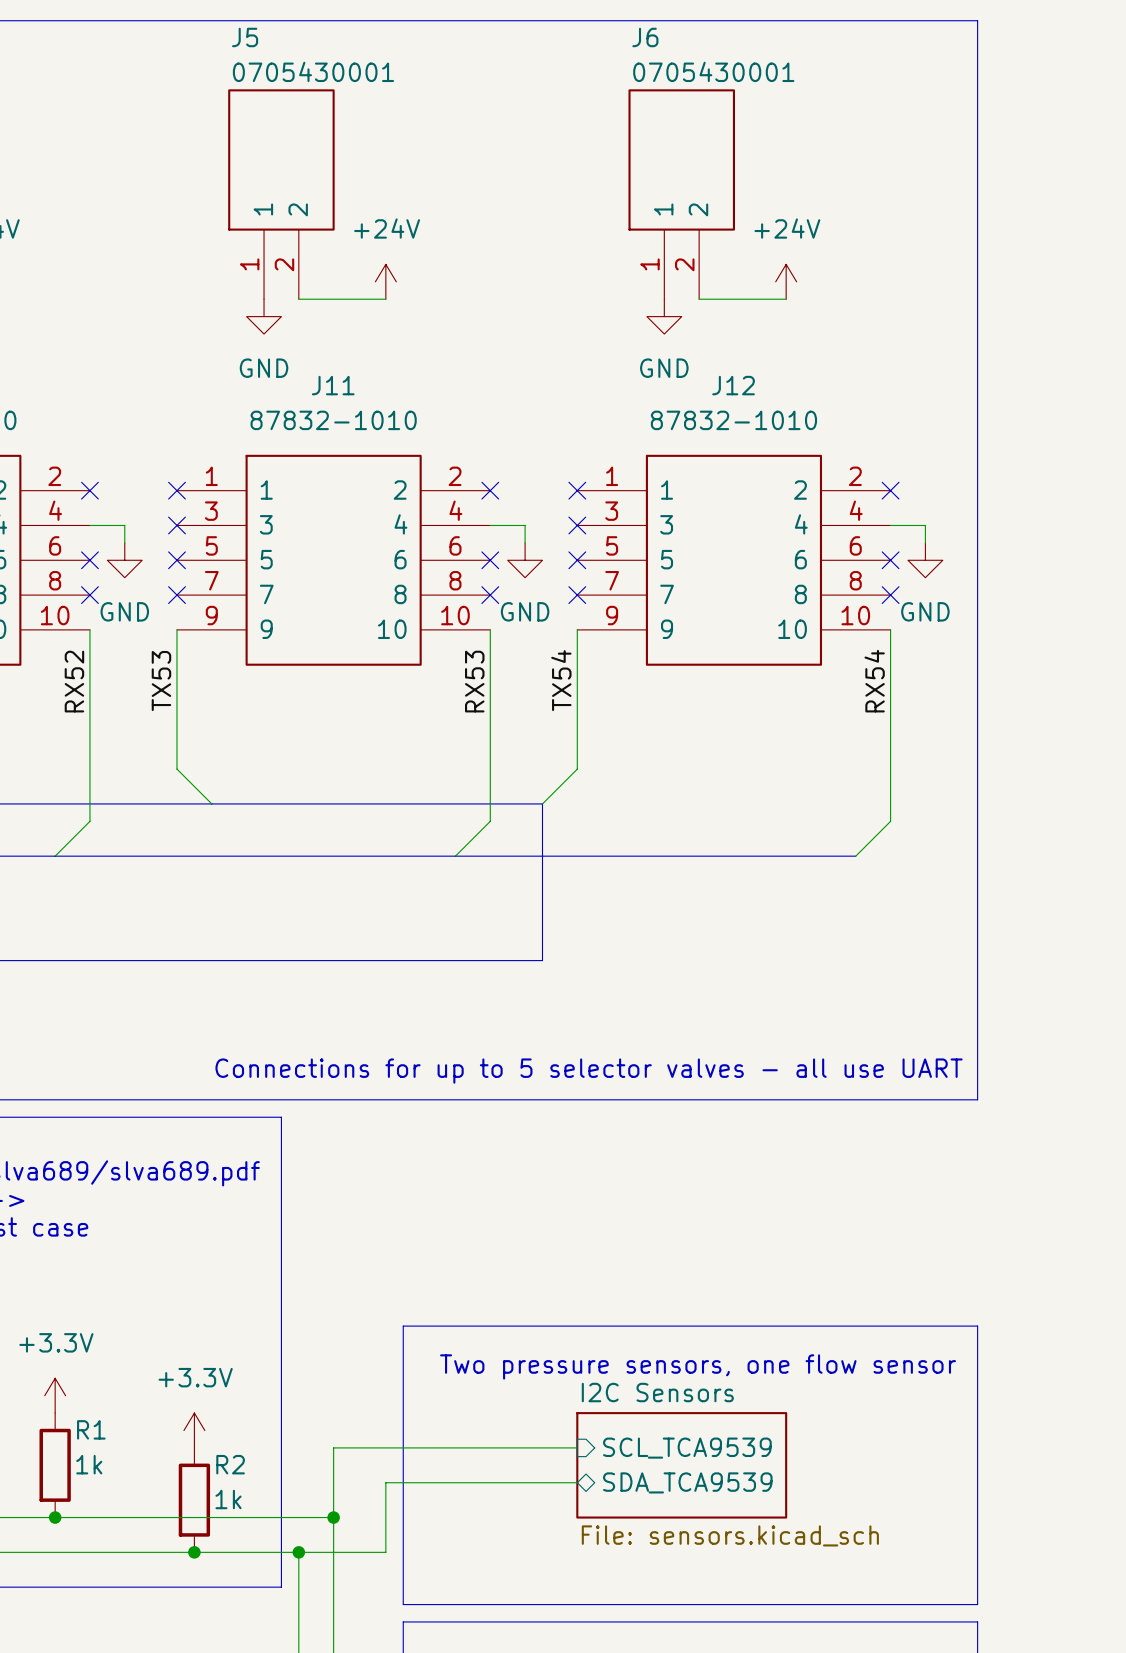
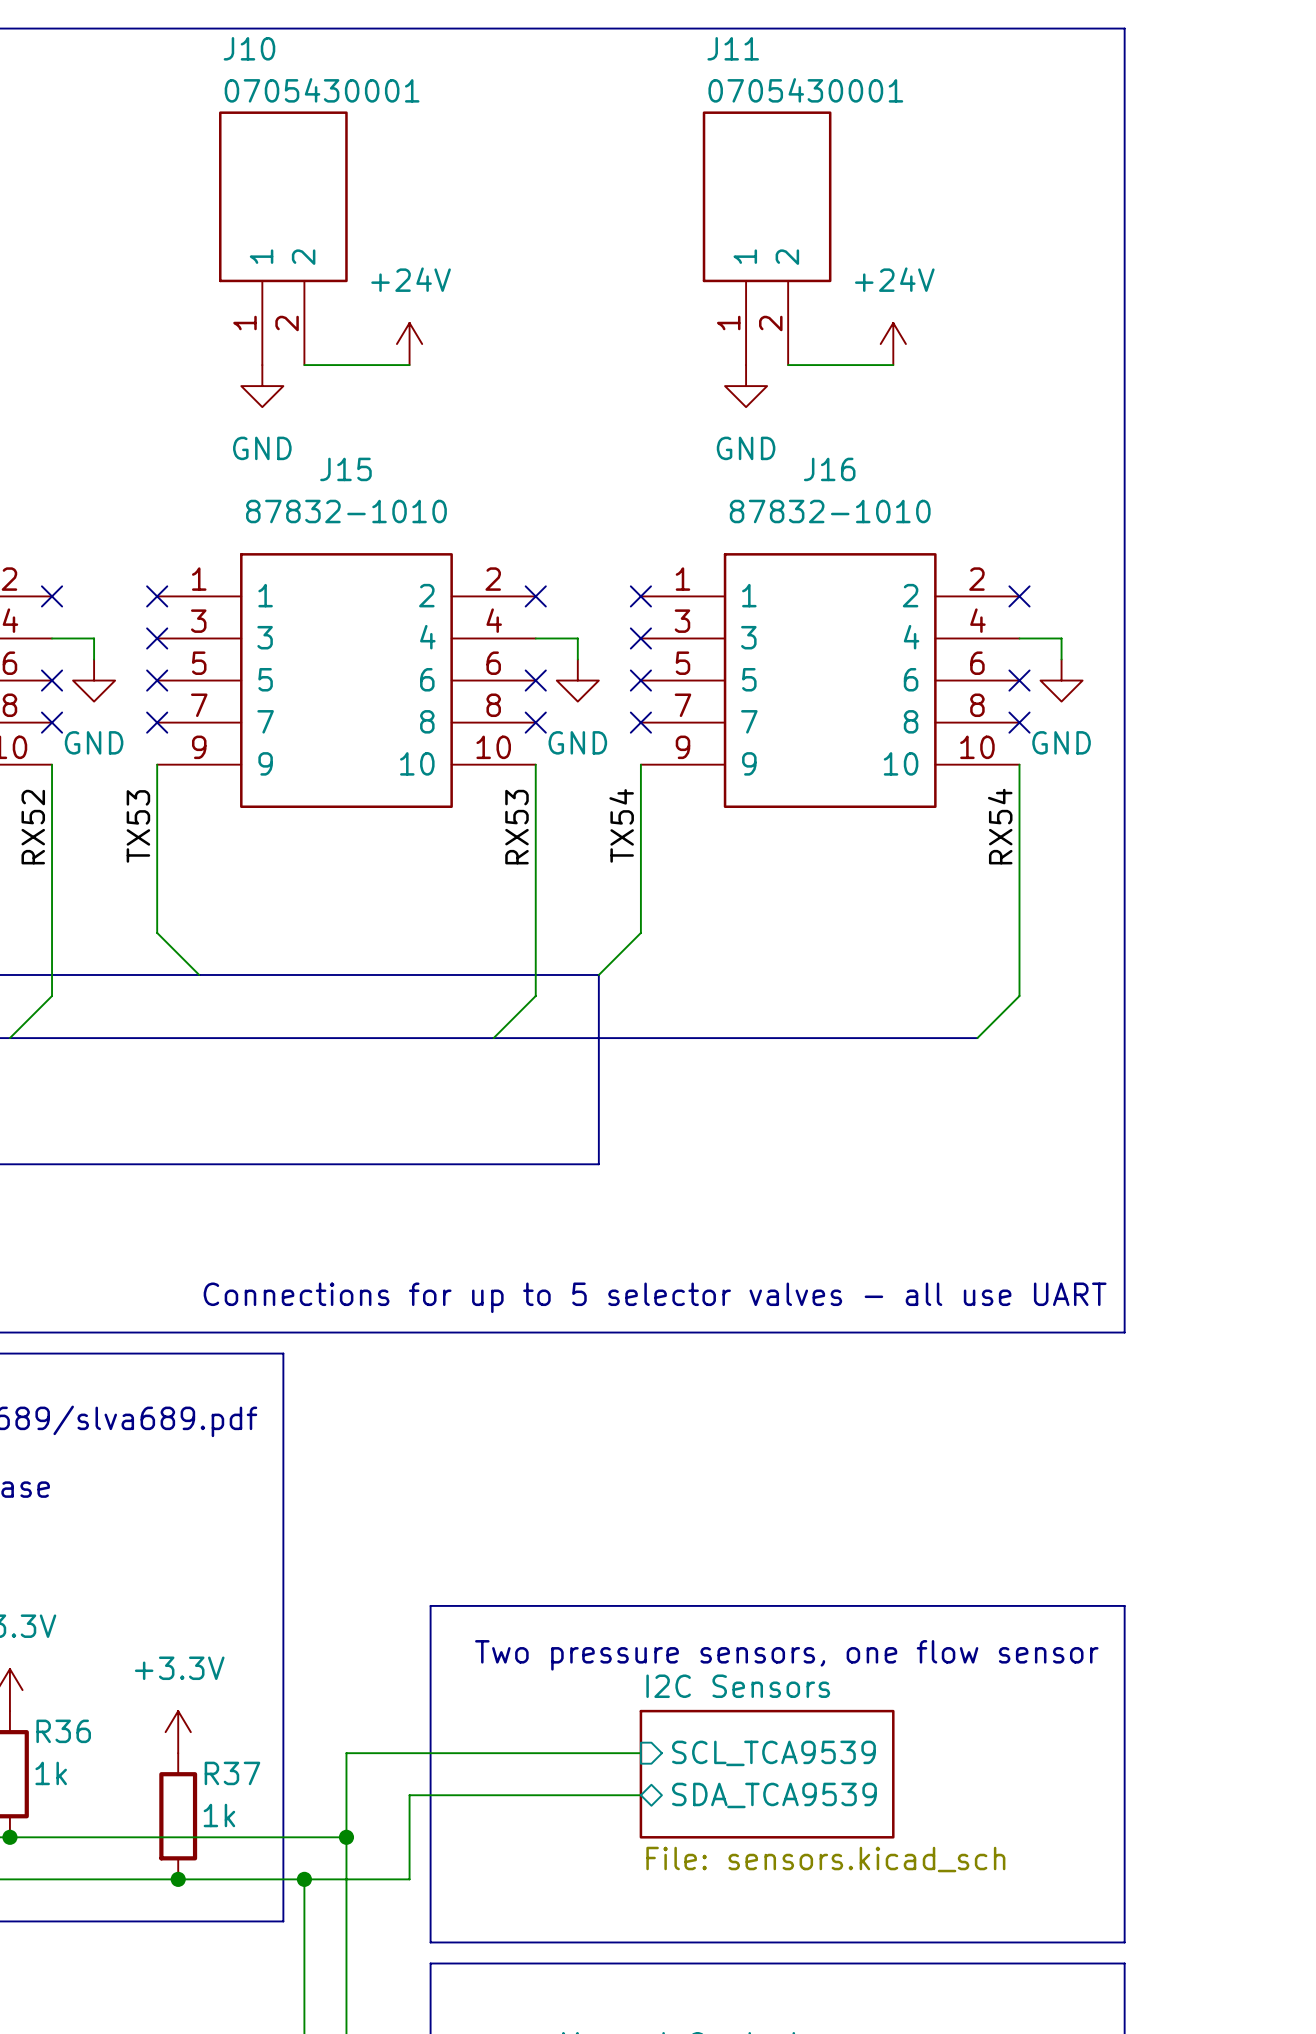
J5 name: J5 (245, 37) -> J10 (249, 48)
J6 name: J6 (645, 37) -> J11 (733, 48)
J11 name: J11 (333, 385) -> J15 (345, 469)
J12 name: J12 (733, 385) -> J16 (829, 469)
R1 name: R1 (91, 1429) -> R36 (63, 1731)
R2 name: R2 (230, 1464) -> R37 (232, 1773)

